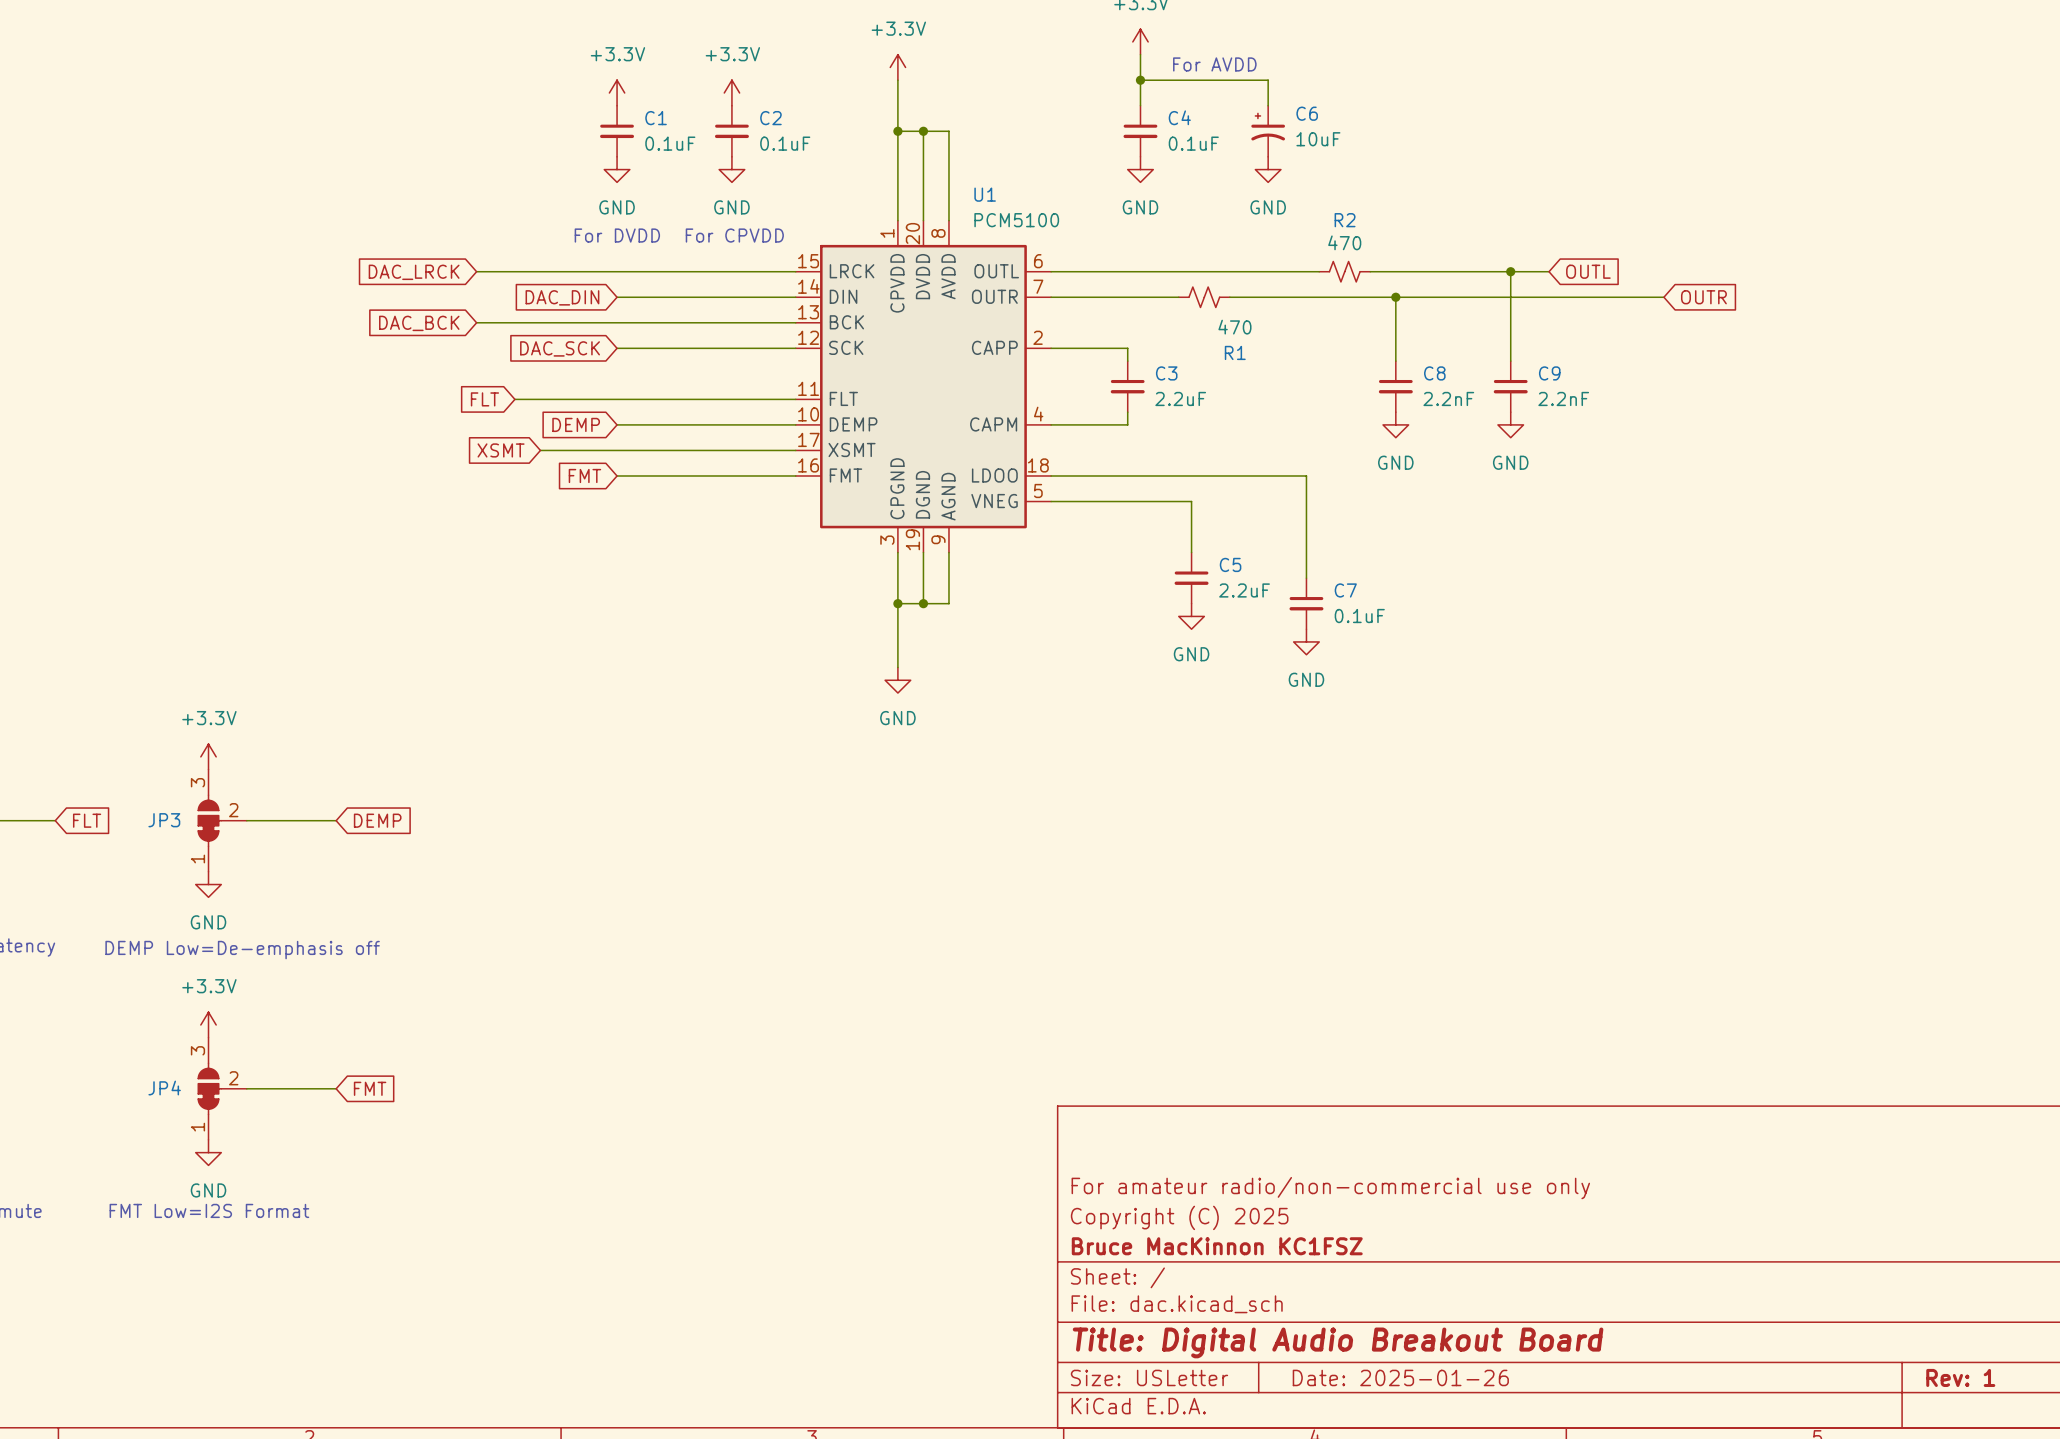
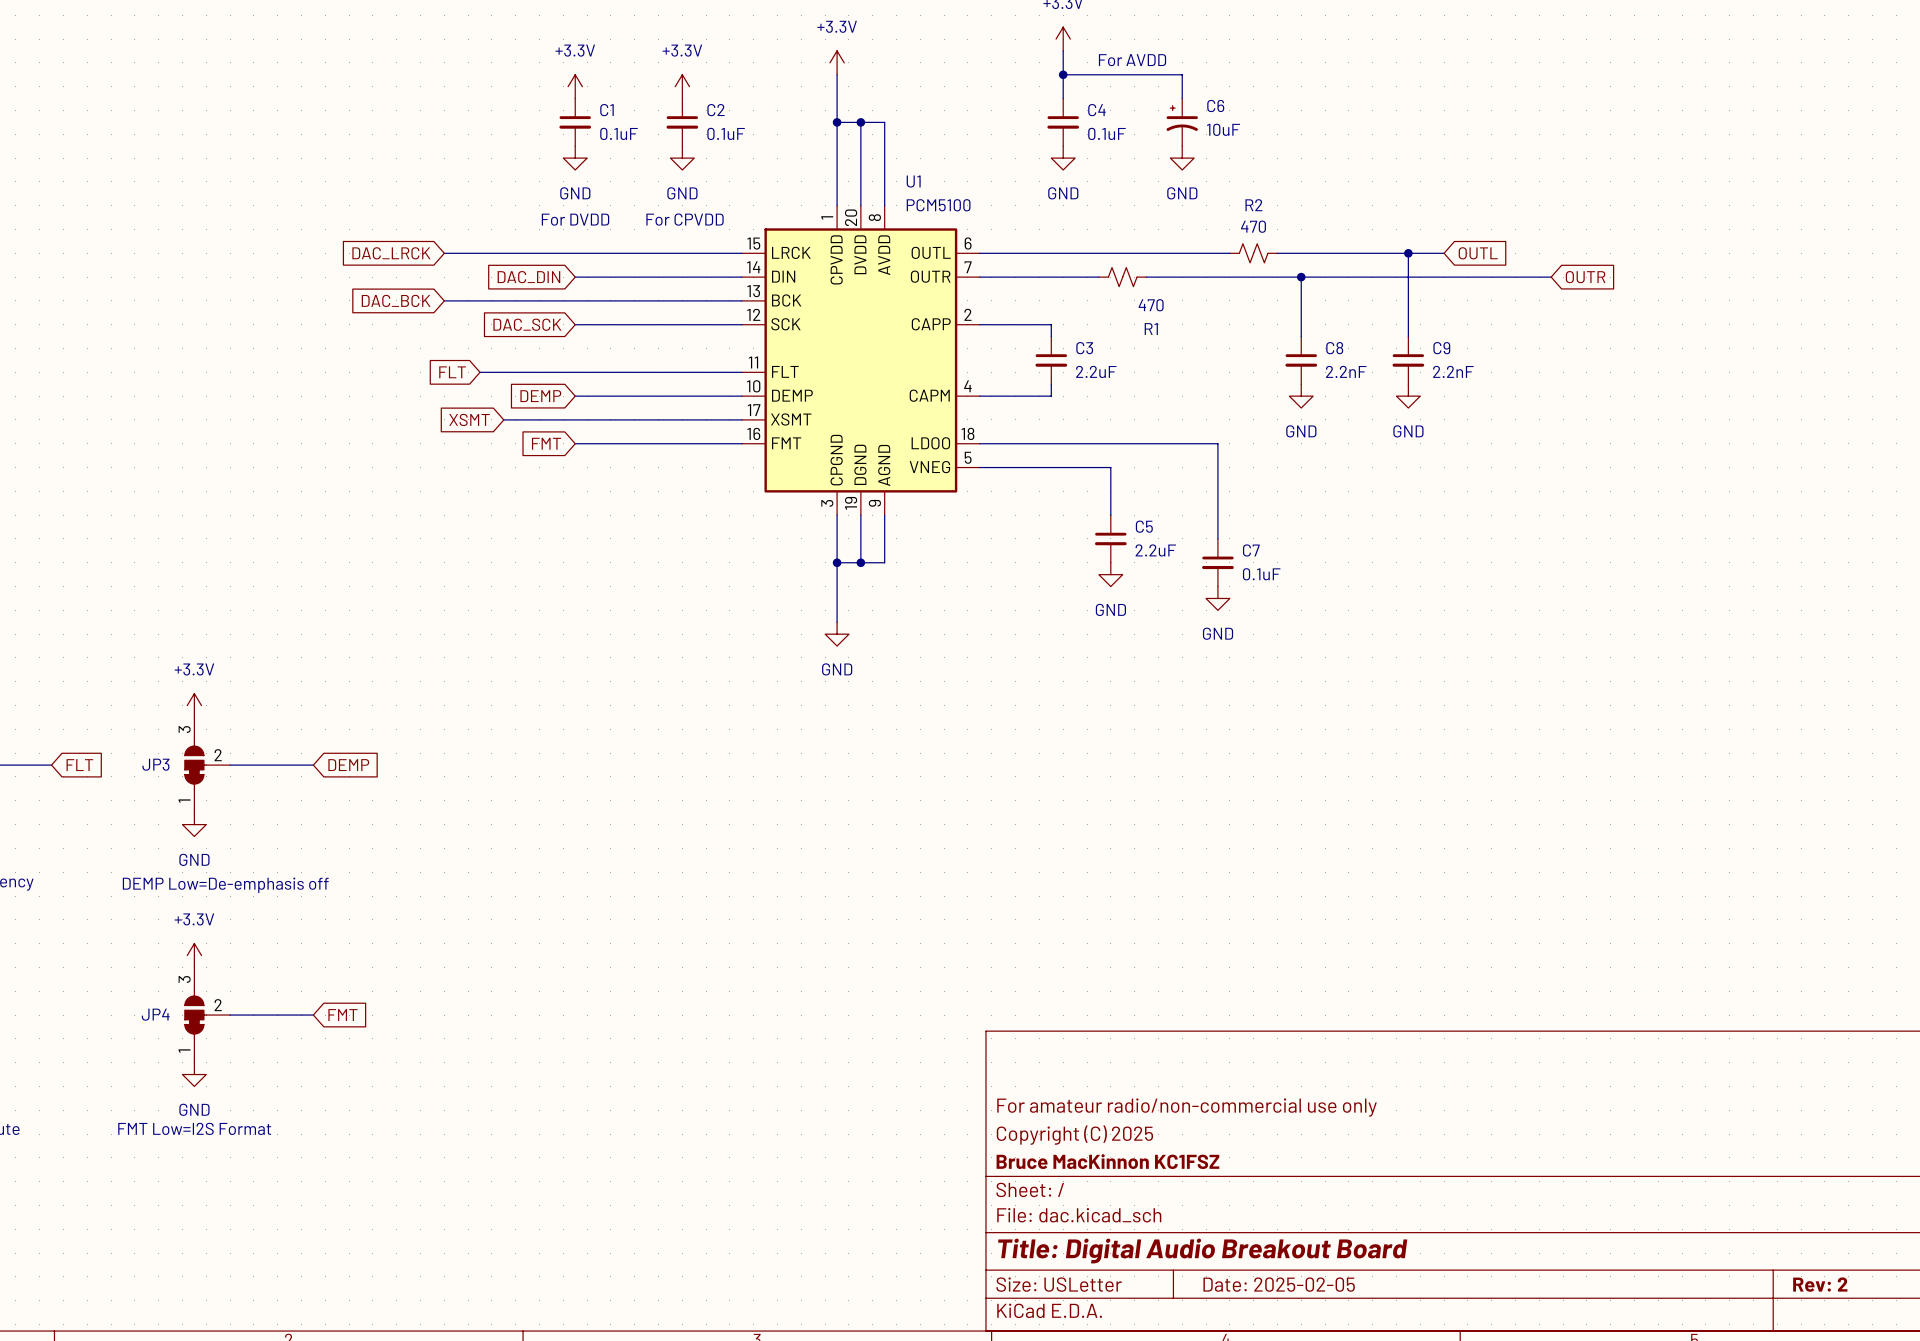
title block: Date: 2025-01-26 (1400, 1377) -> Date: 2025-02-05 (1279, 1284)
title block: Rev: 1 (1960, 1377) -> Rev: 2 (1820, 1284)

